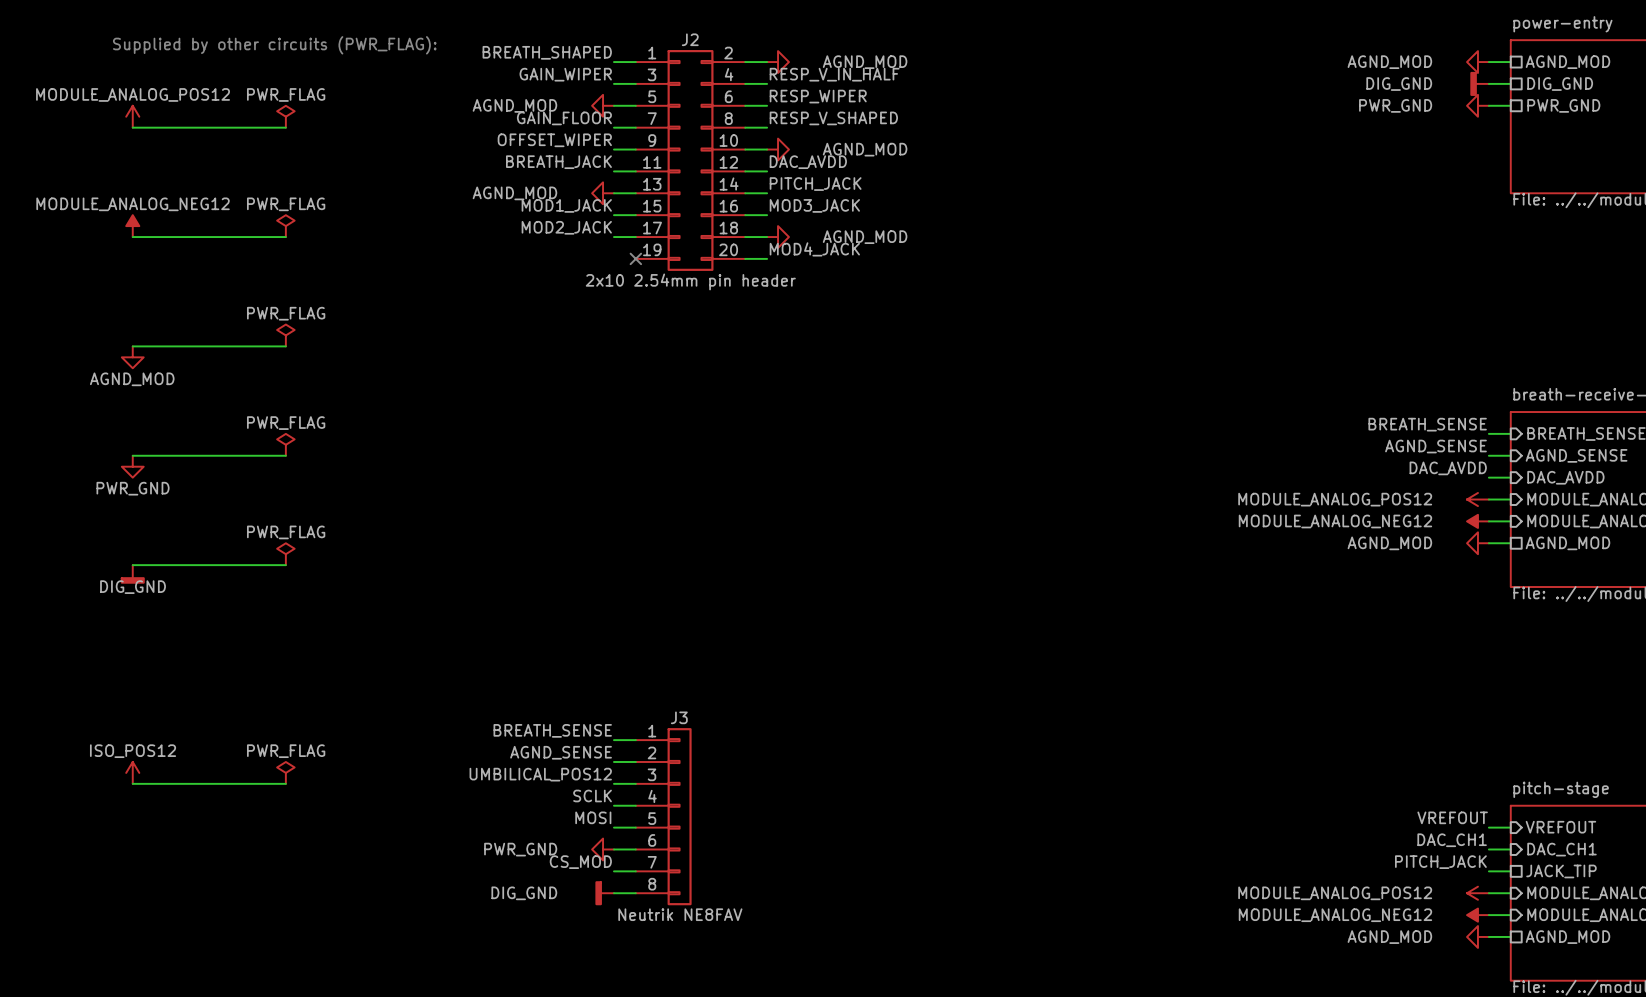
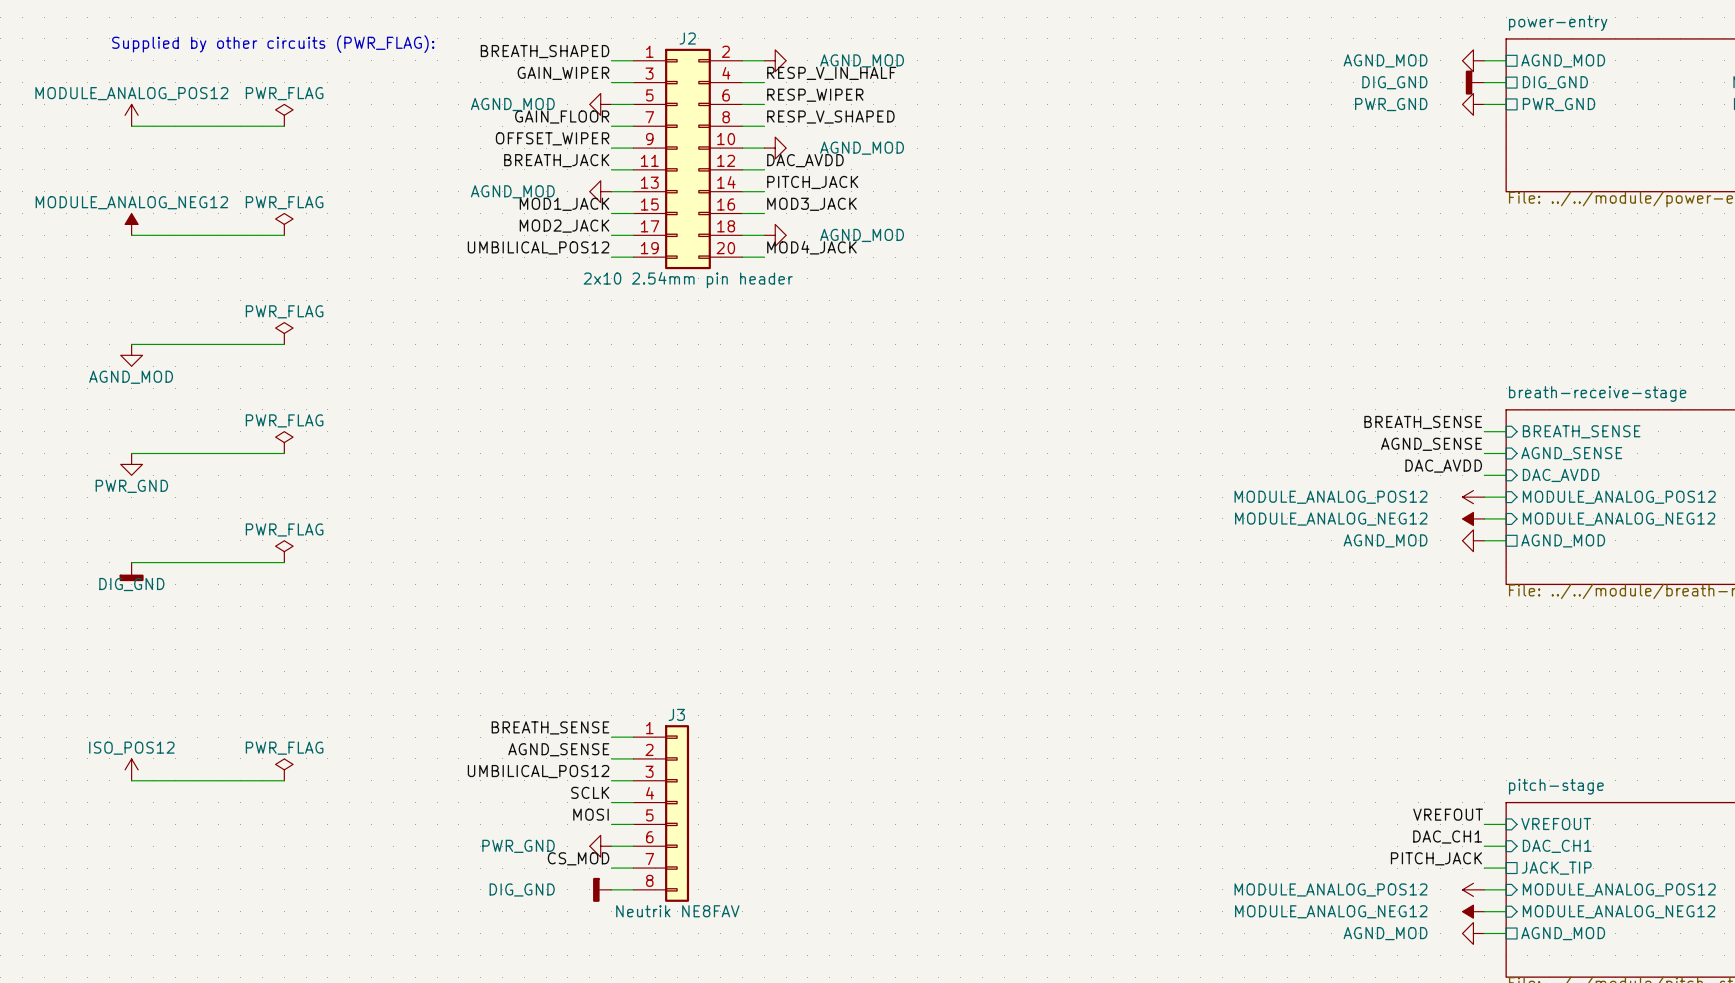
label: none -> UMBILICAL_POS12 (538, 247)
wire: none -> (611, 257) (633, 257)
no-connect mark: (635, 258) -> none

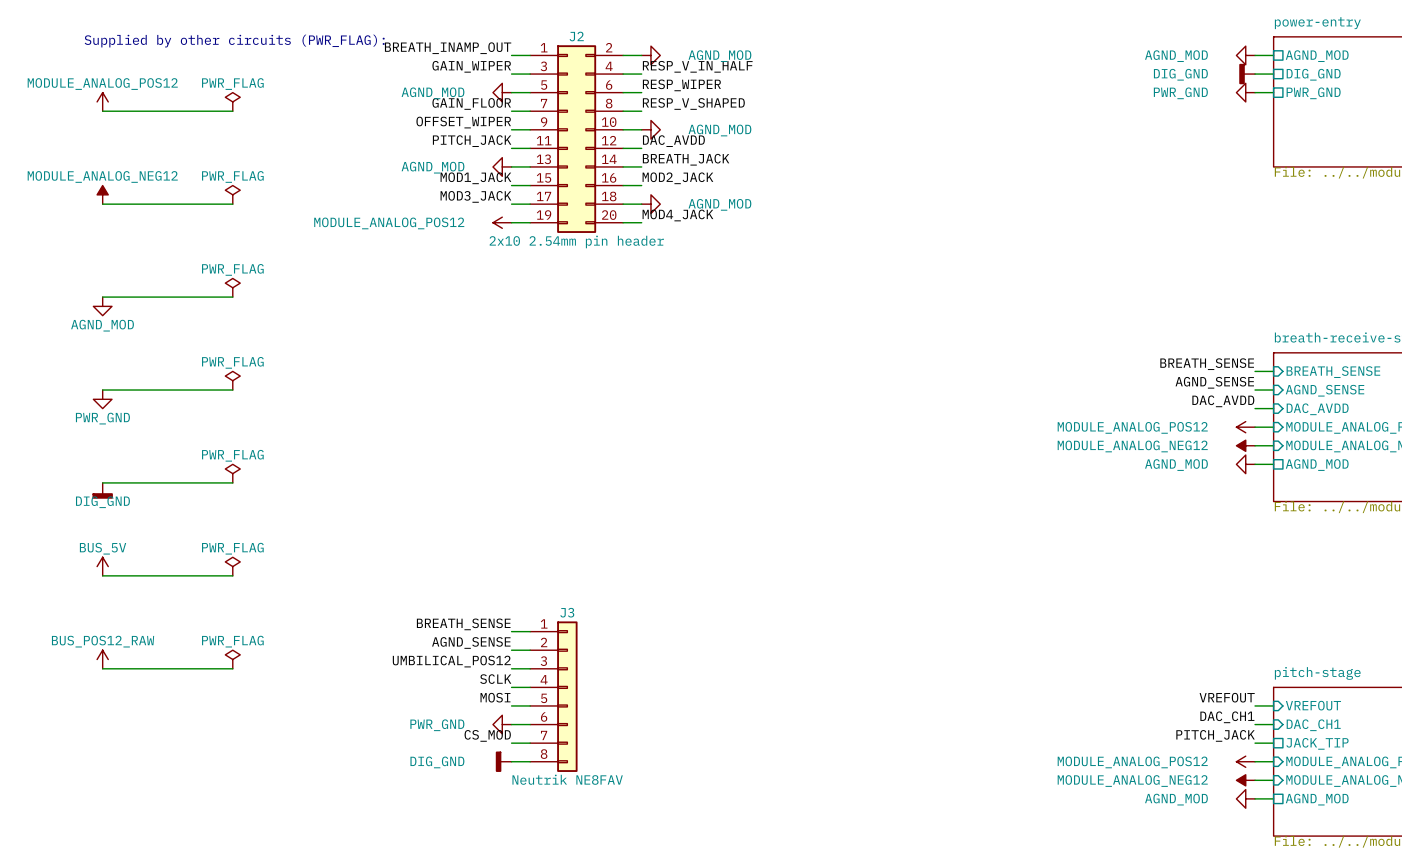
label: BREATH_SHAPED (545, 51) -> BREATH_INAMP_OUT (448, 48)
label: BREATH_JACK (556, 160) -> PITCH_JACK (472, 141)
label: PITCH_JACK (812, 182) -> BREATH_JACK (686, 159)
label: MOD3_JACK (811, 204) -> MOD2_JACK (677, 178)
label: MOD2_JACK (564, 226) -> MOD3_JACK (475, 196)
label: UMBILICAL_POS12 (538, 247) -> none
power symbol: none -> MODULE_ANALOG_POS12 (502, 222)
power symbol: none -> BUS_5V (102, 566)
power symbol: none -> PWR_FLAG (232, 566)
wire: none -> (102, 575) (232, 575)
power symbol: ISO_POS12 (131, 769) -> BUS_POS12_RAW (102, 659)

